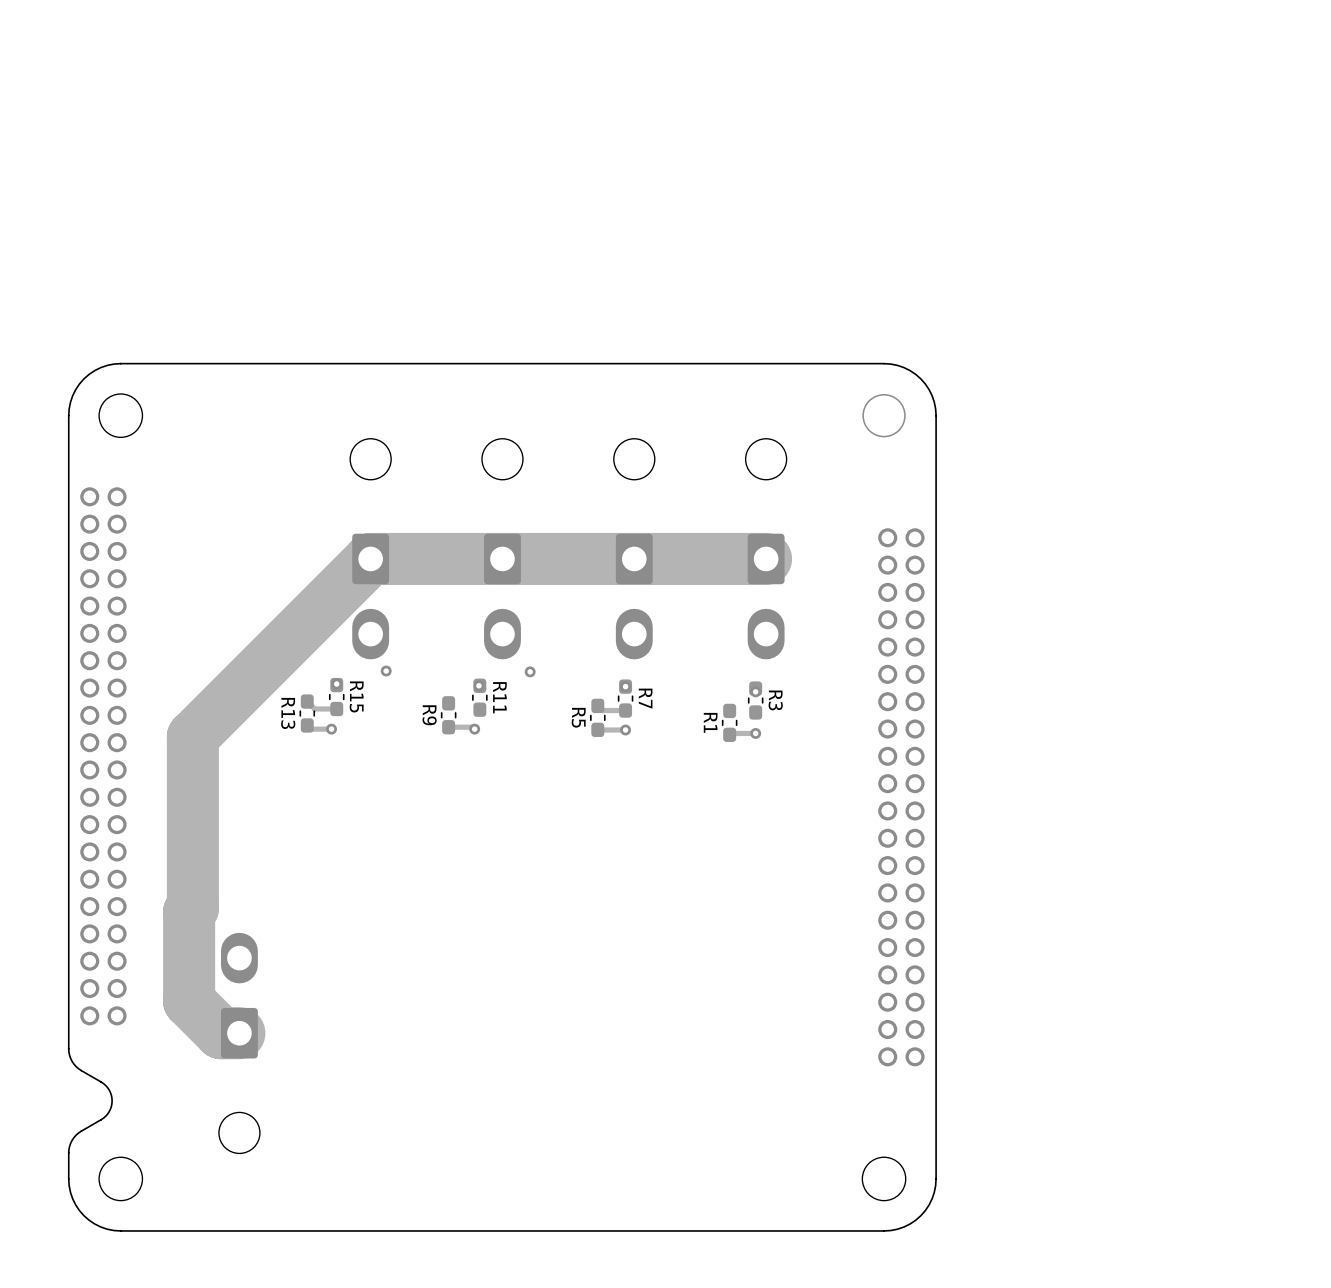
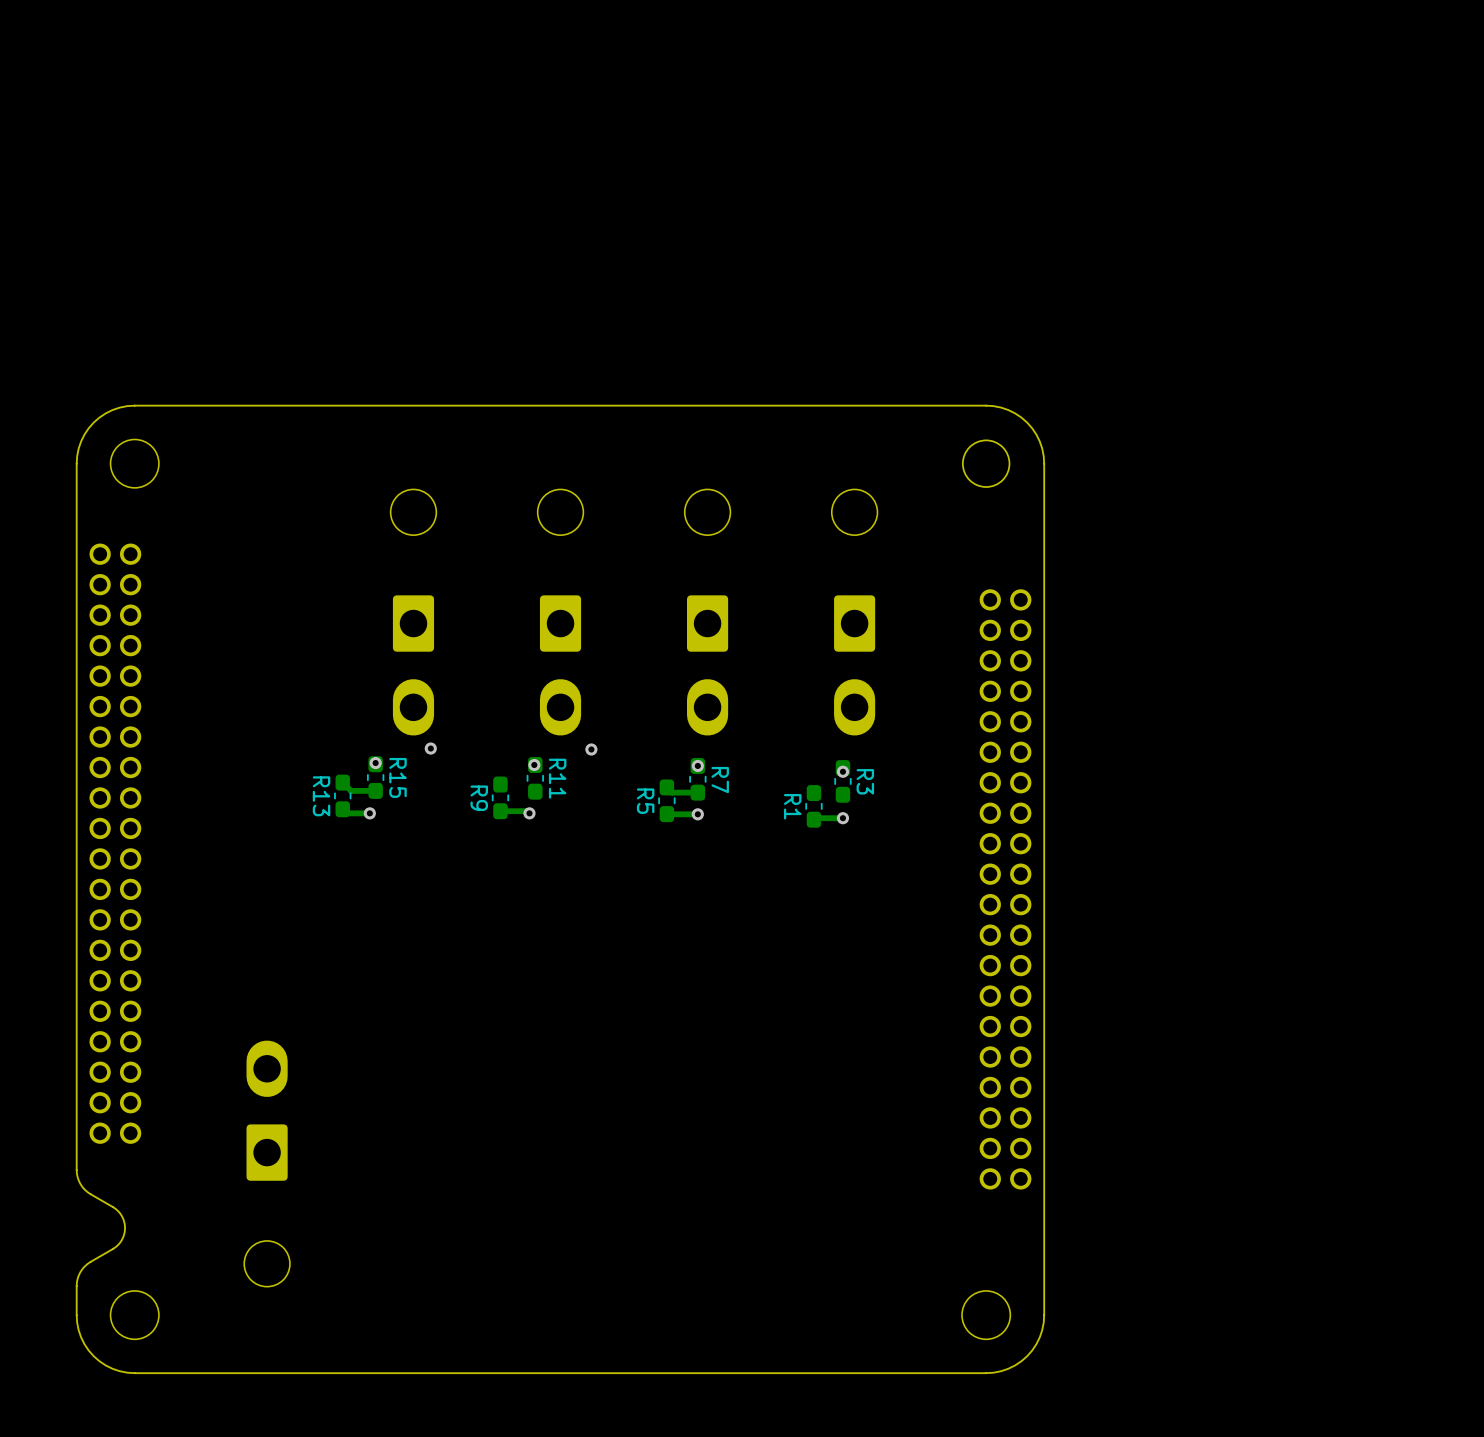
track: (766, 558) (370, 558) (192, 736) (192, 908) (189, 911) (189, 1001) (220, 1033) (239, 1033) -> none

